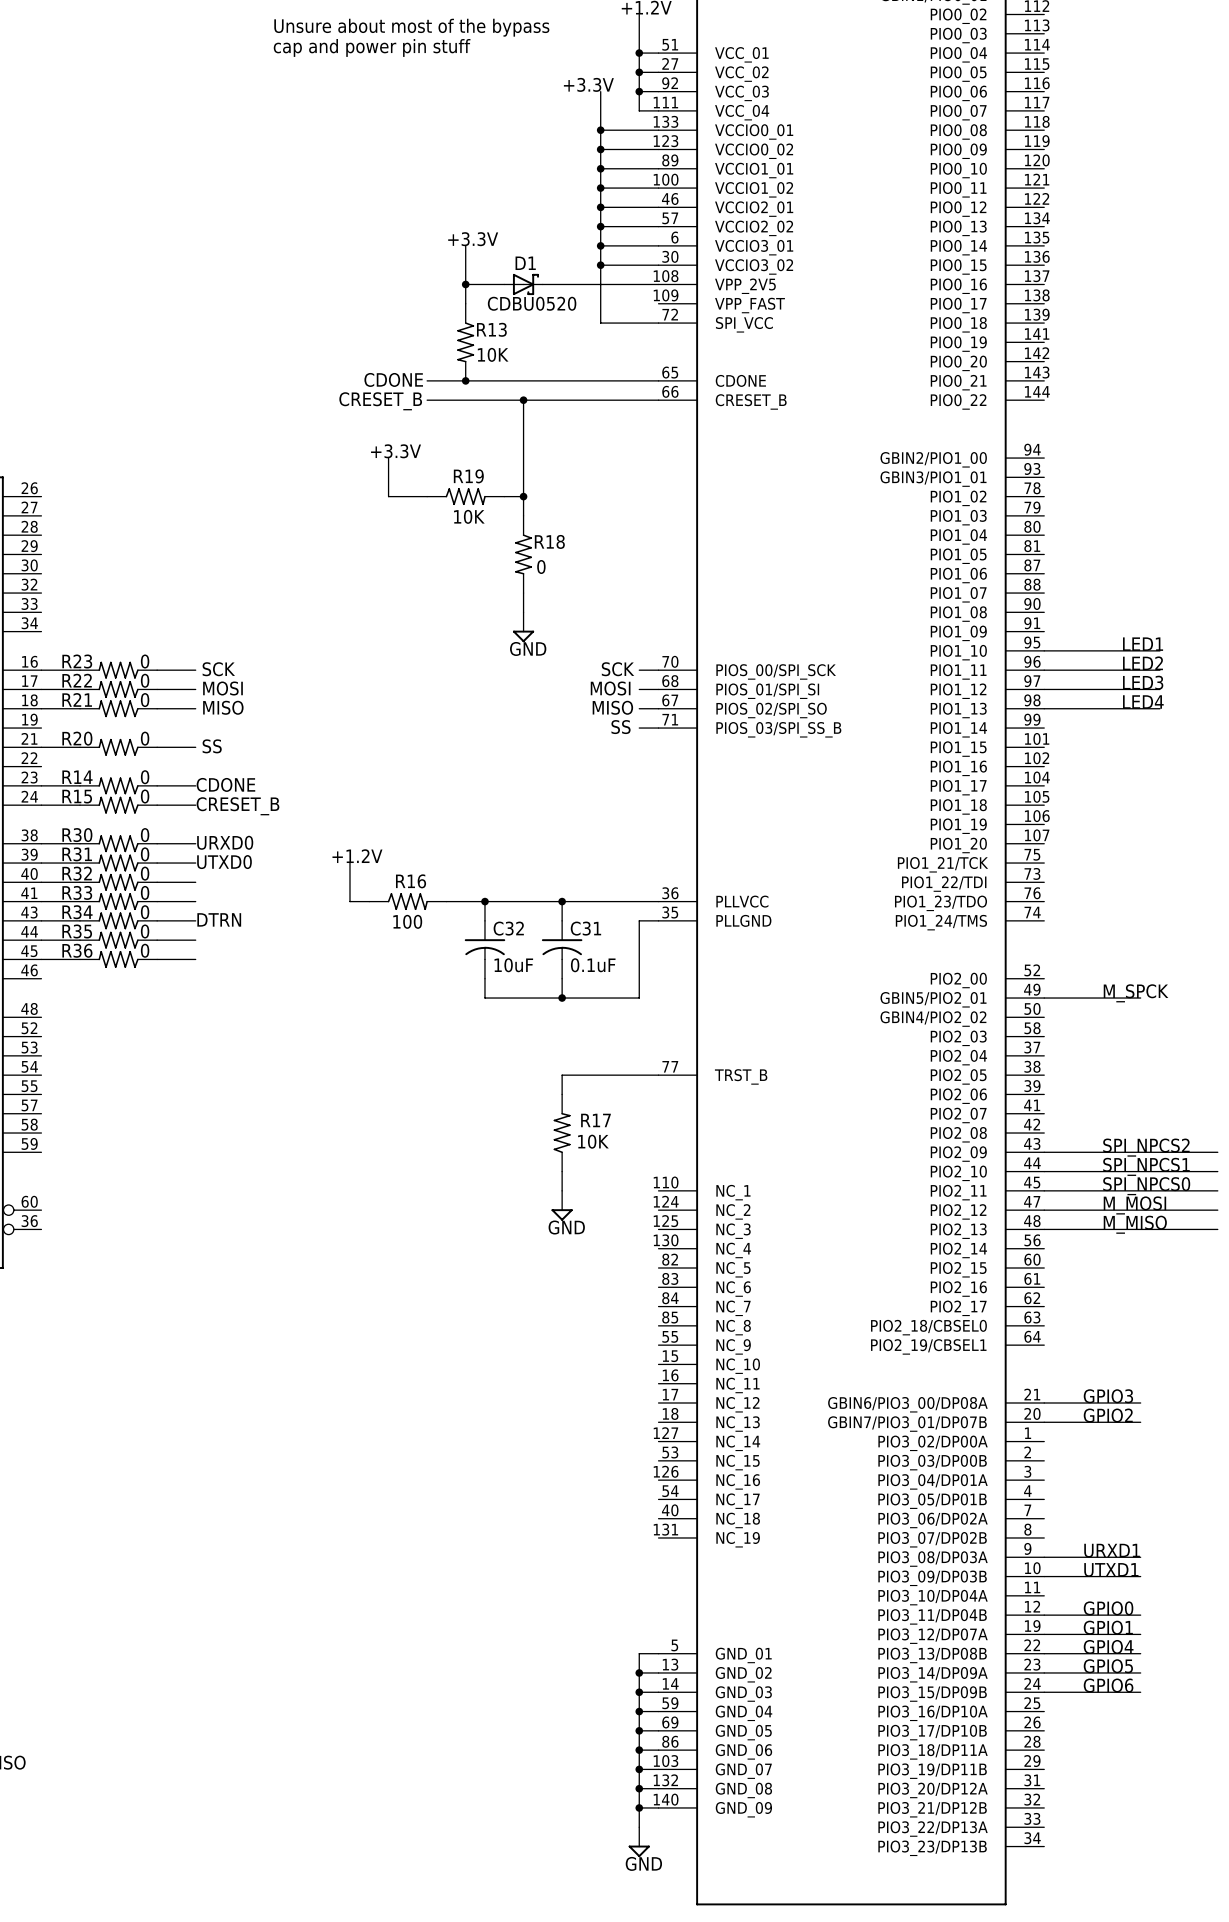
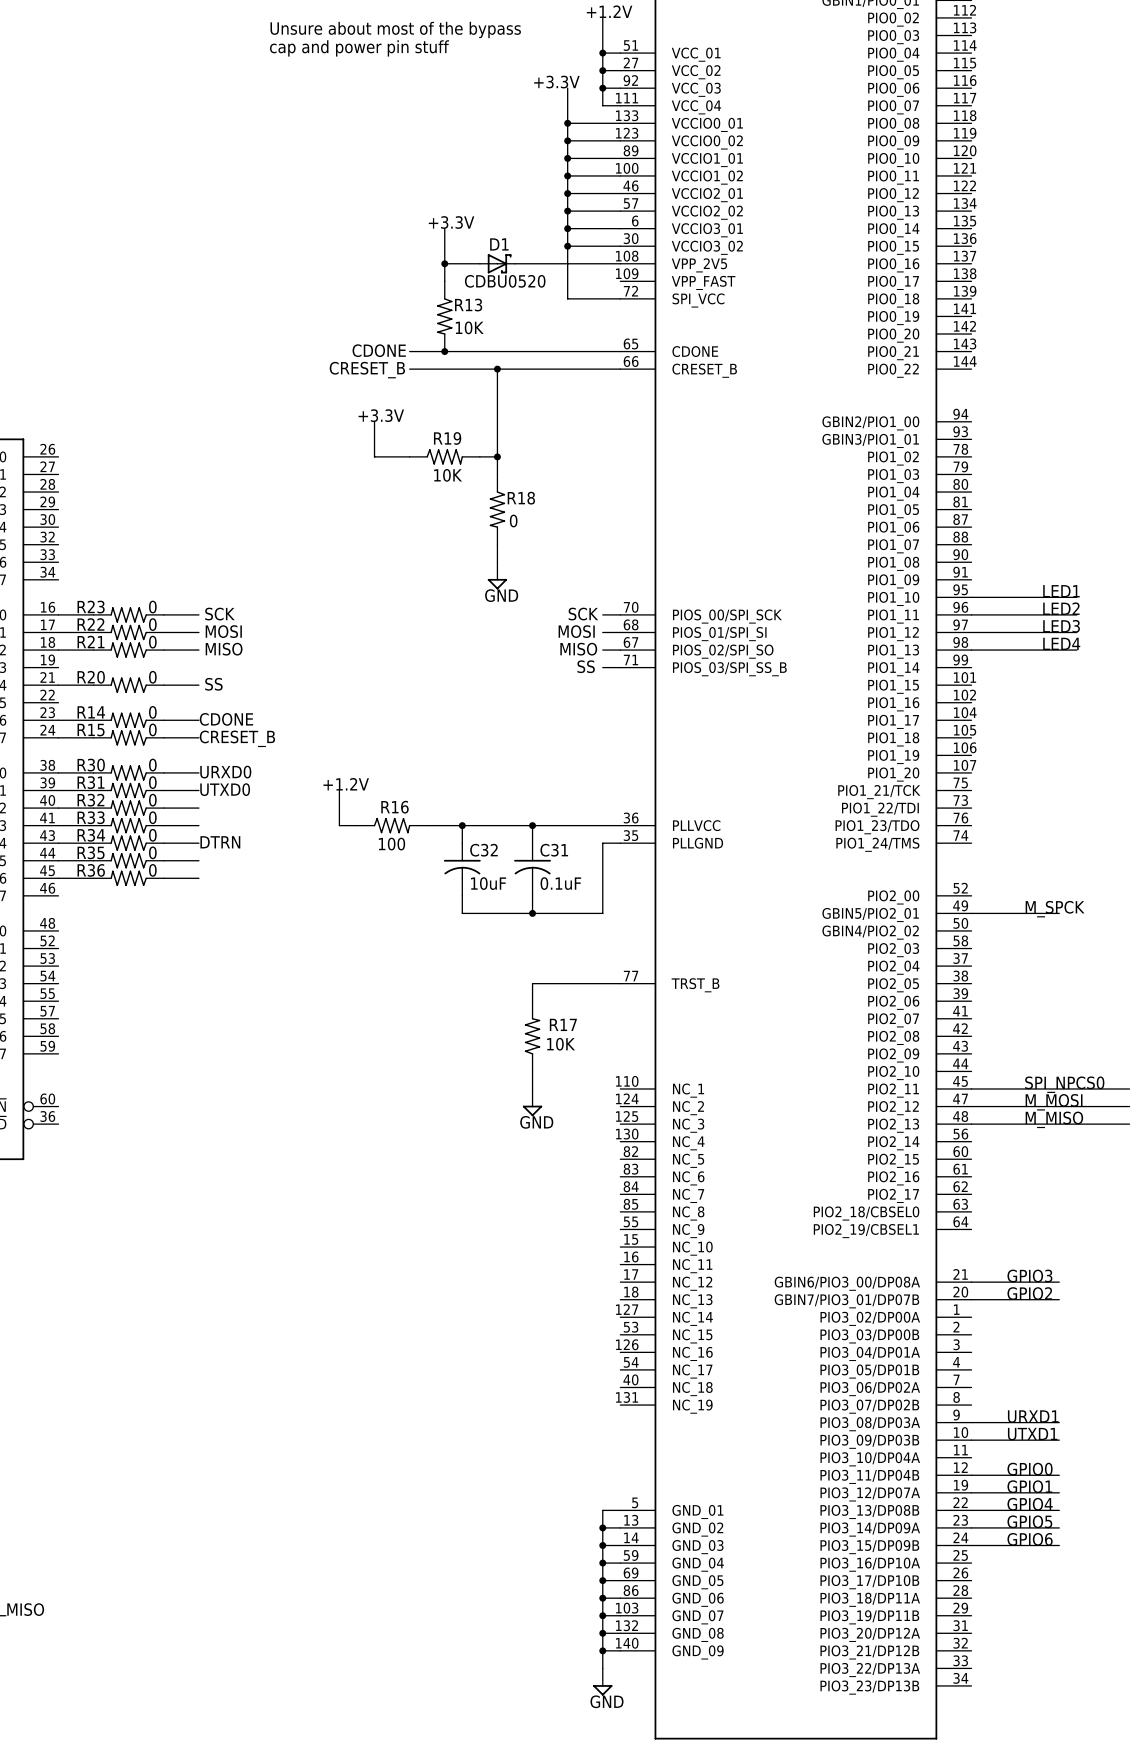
label: SPI_NPCS2 (1146, 1147) -> none
wire: (1044, 1152) (1217, 1152) -> none
label: SPI_NPCS1 (1146, 1166) -> none
wire: (1044, 1171) (1217, 1171) -> none

